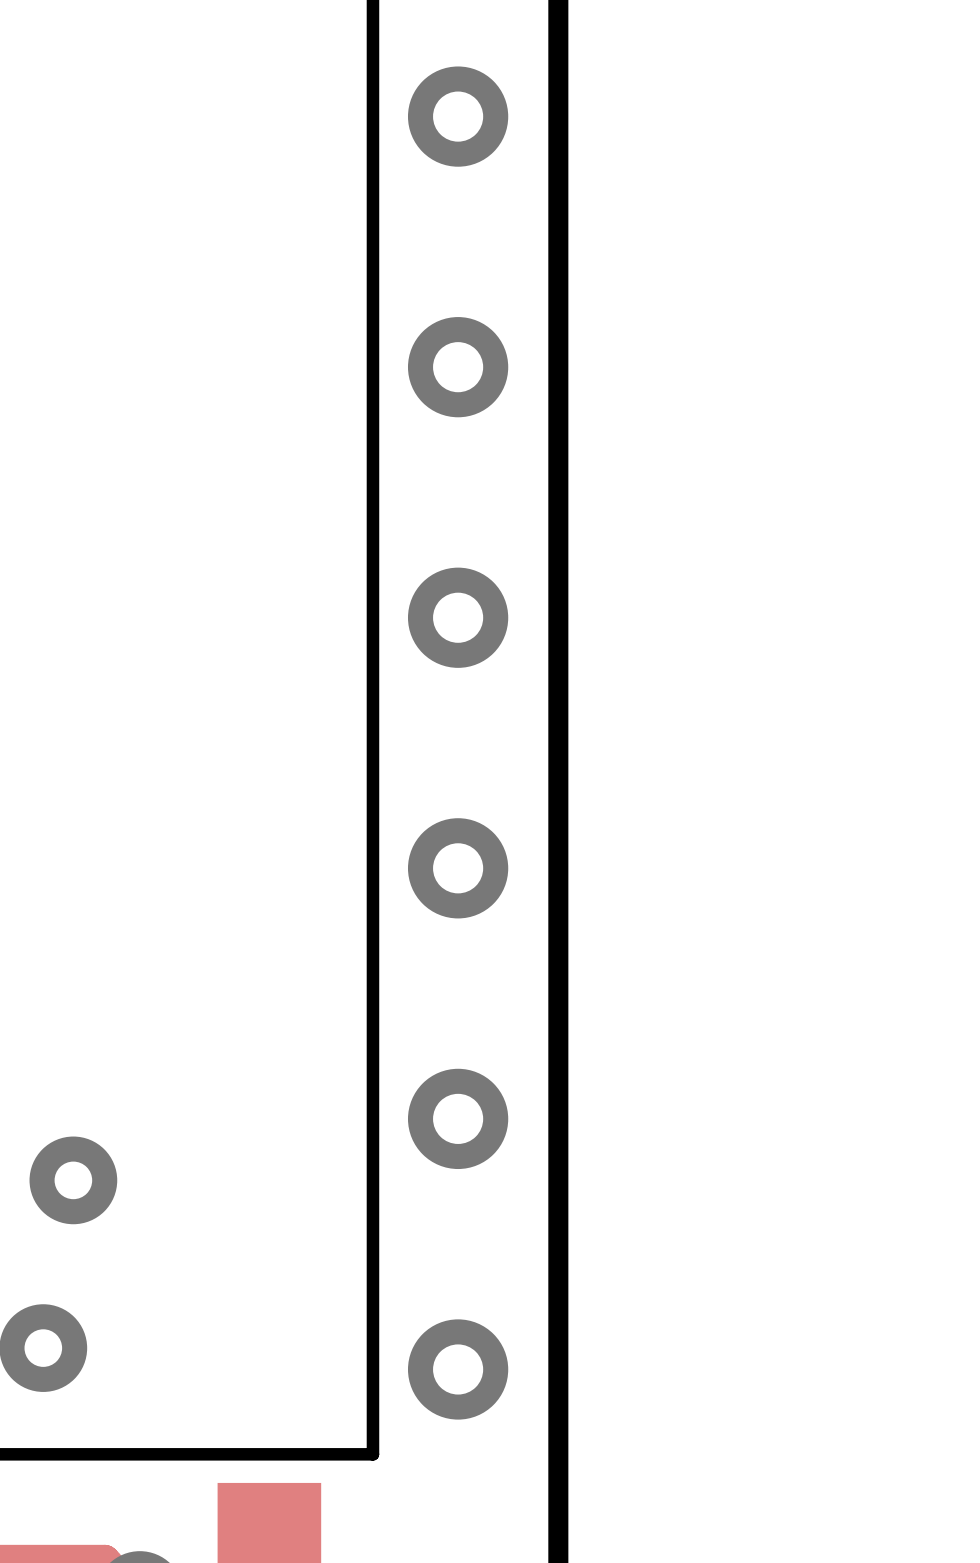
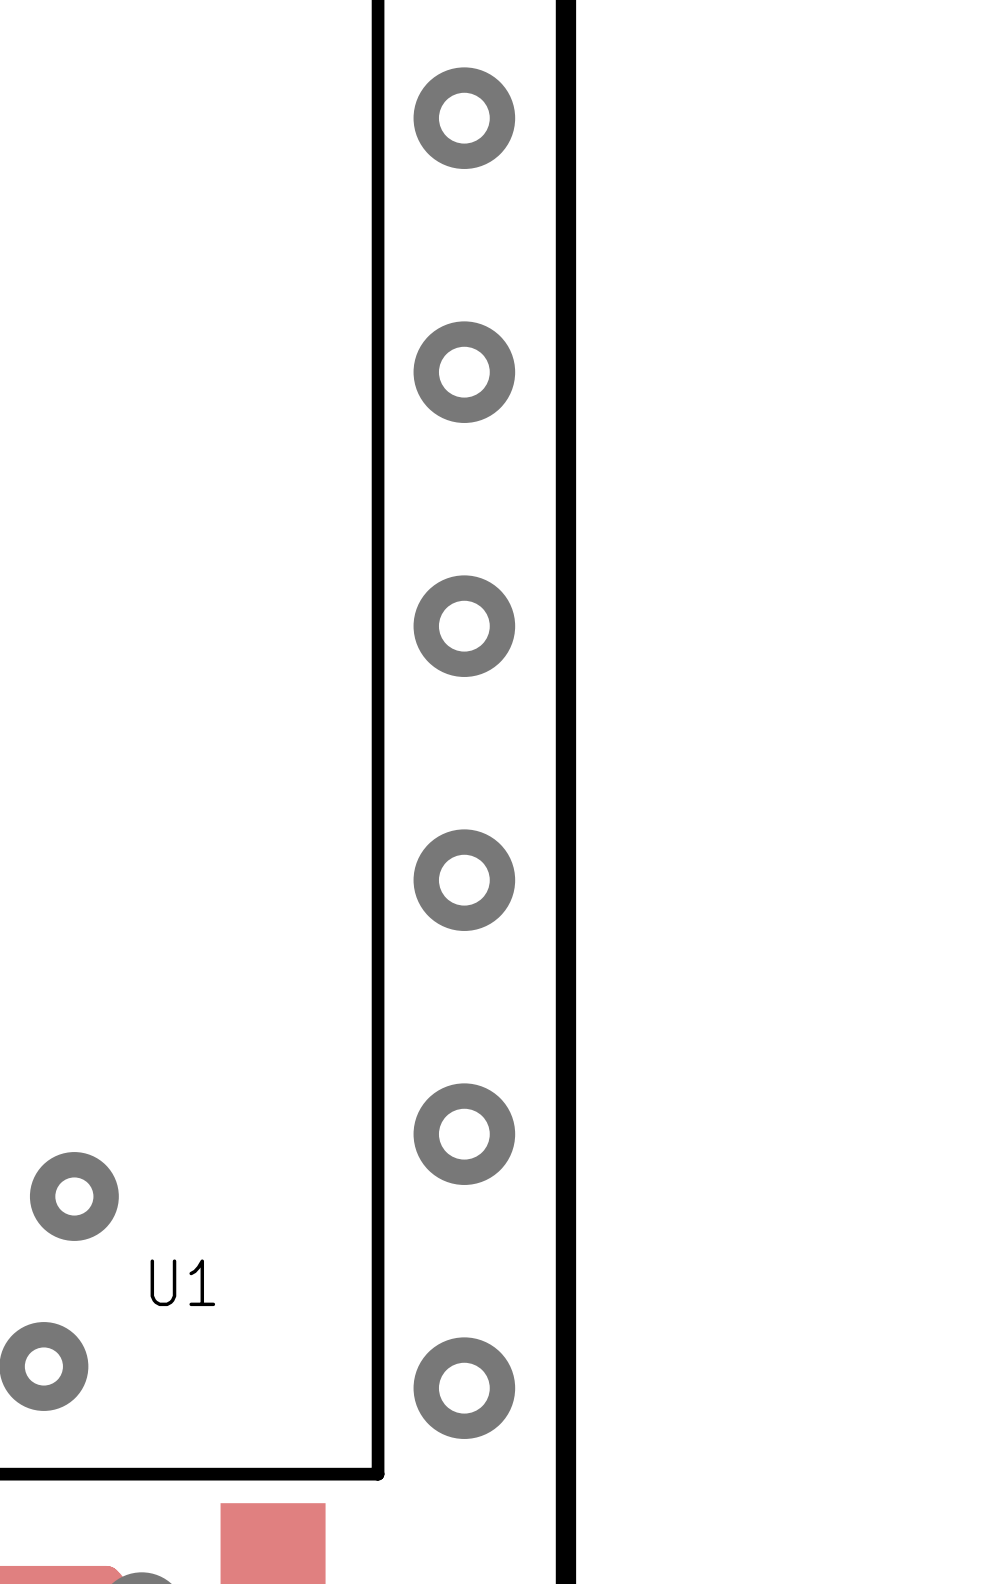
U1 name: none -> U1 (182, 1282)

